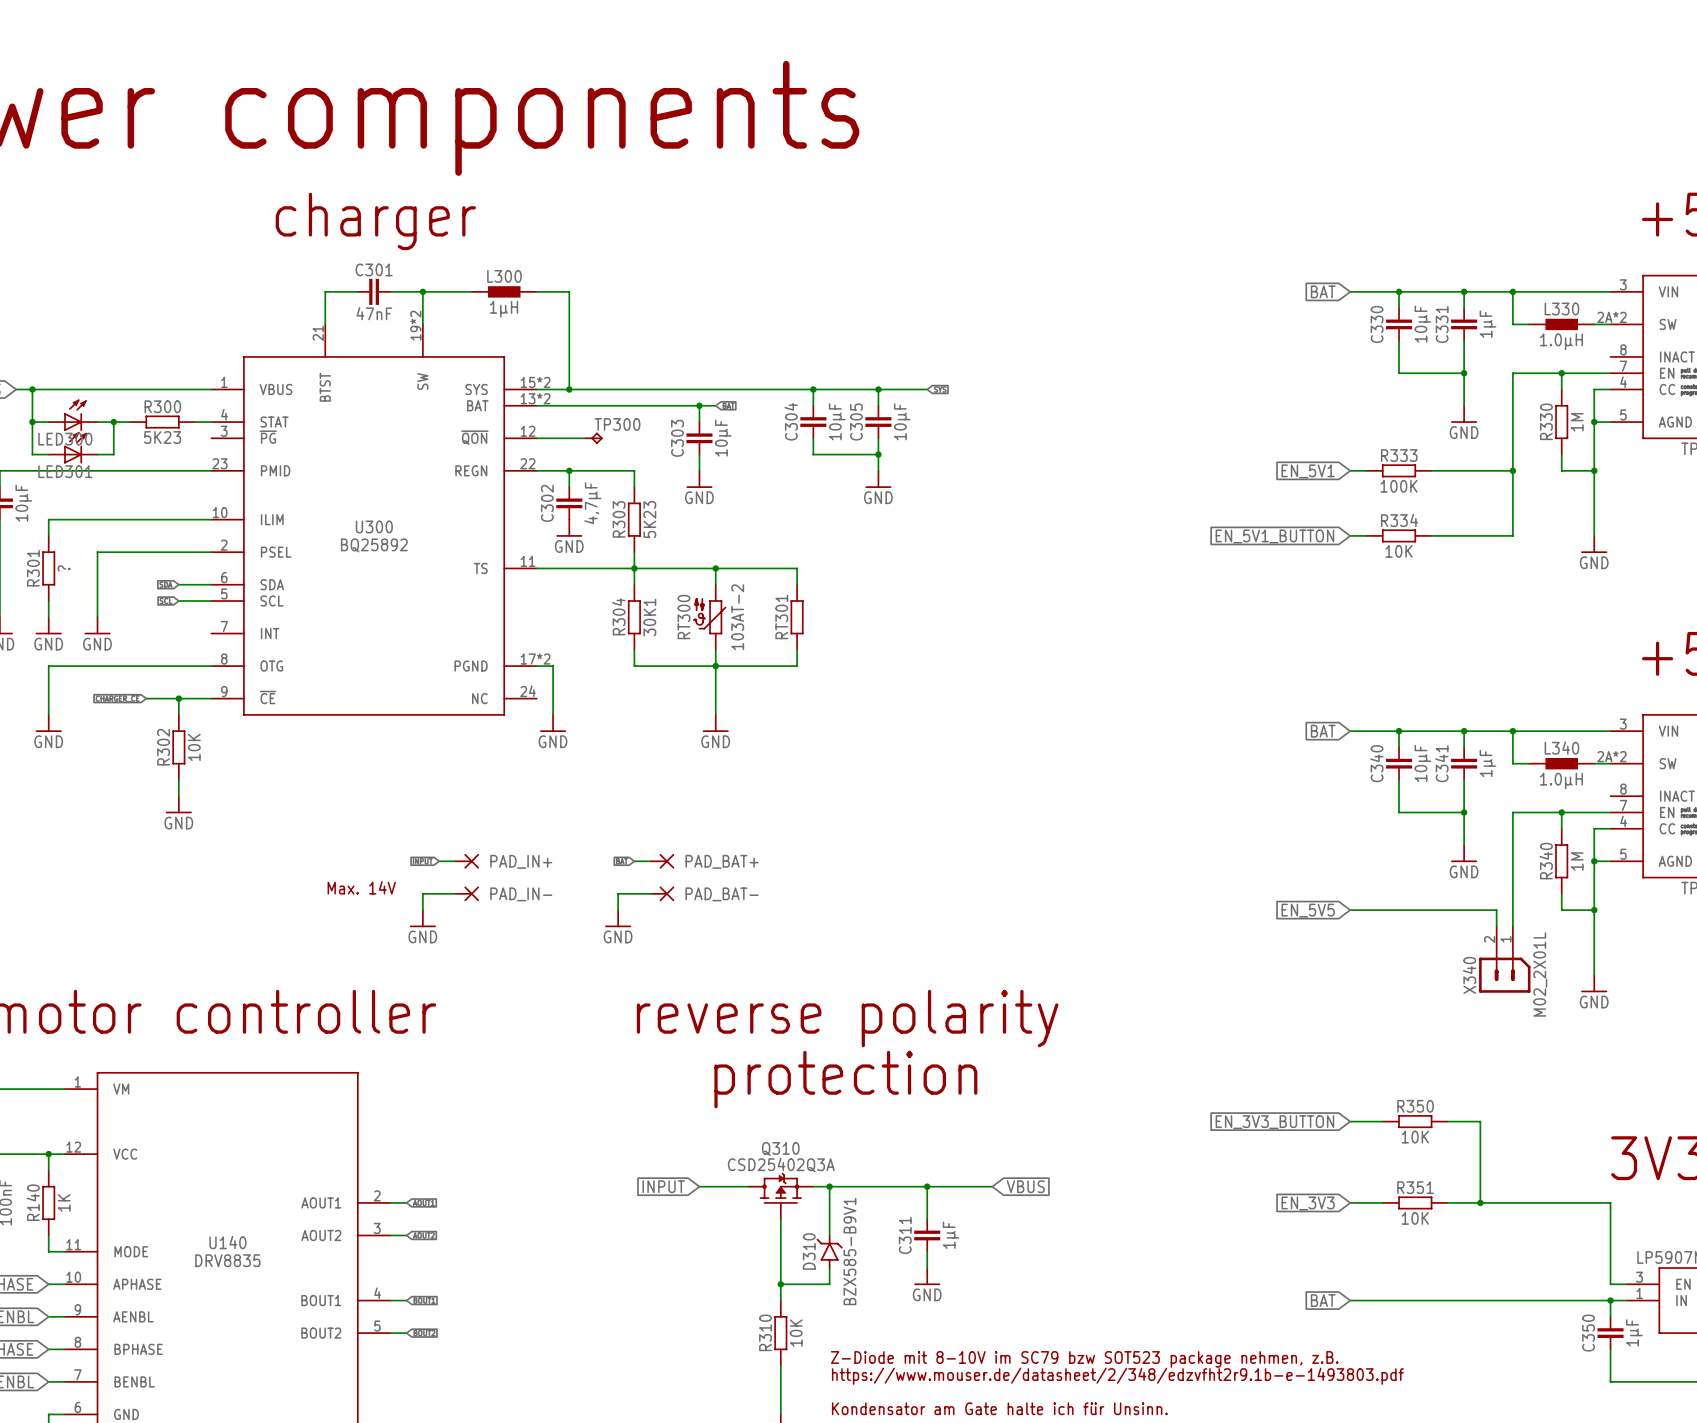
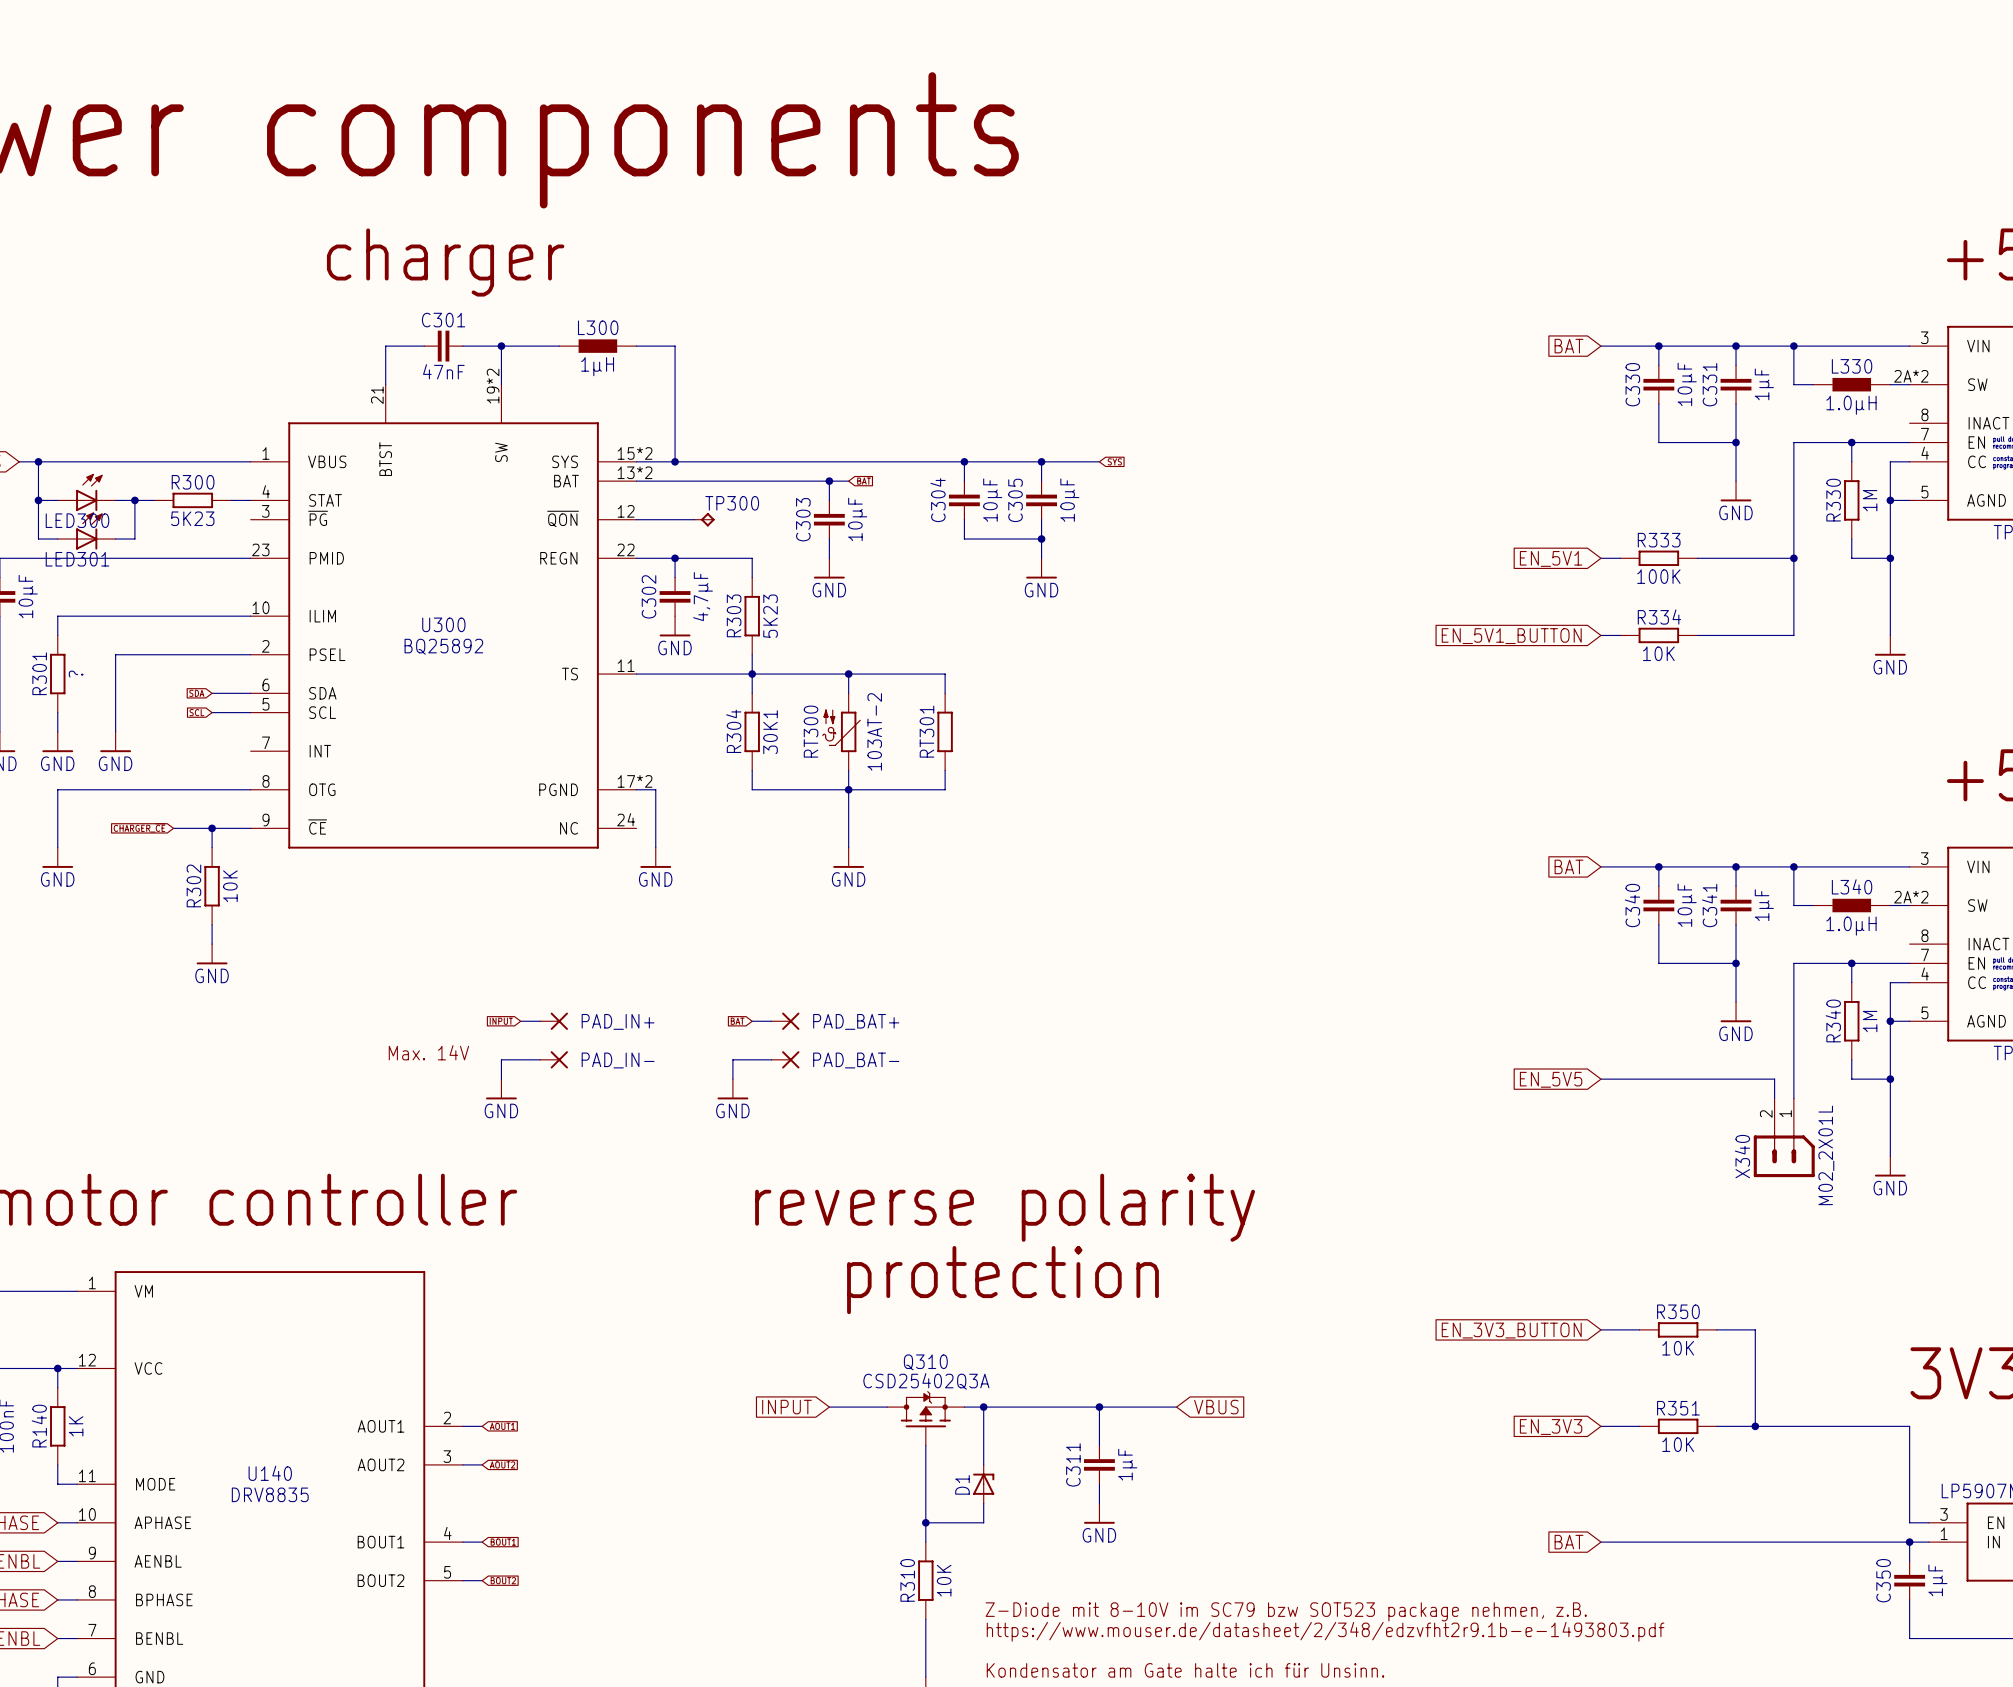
D310: BZX585-B9V1 (829, 1251) -> none
D1: none -> (983, 1484)

